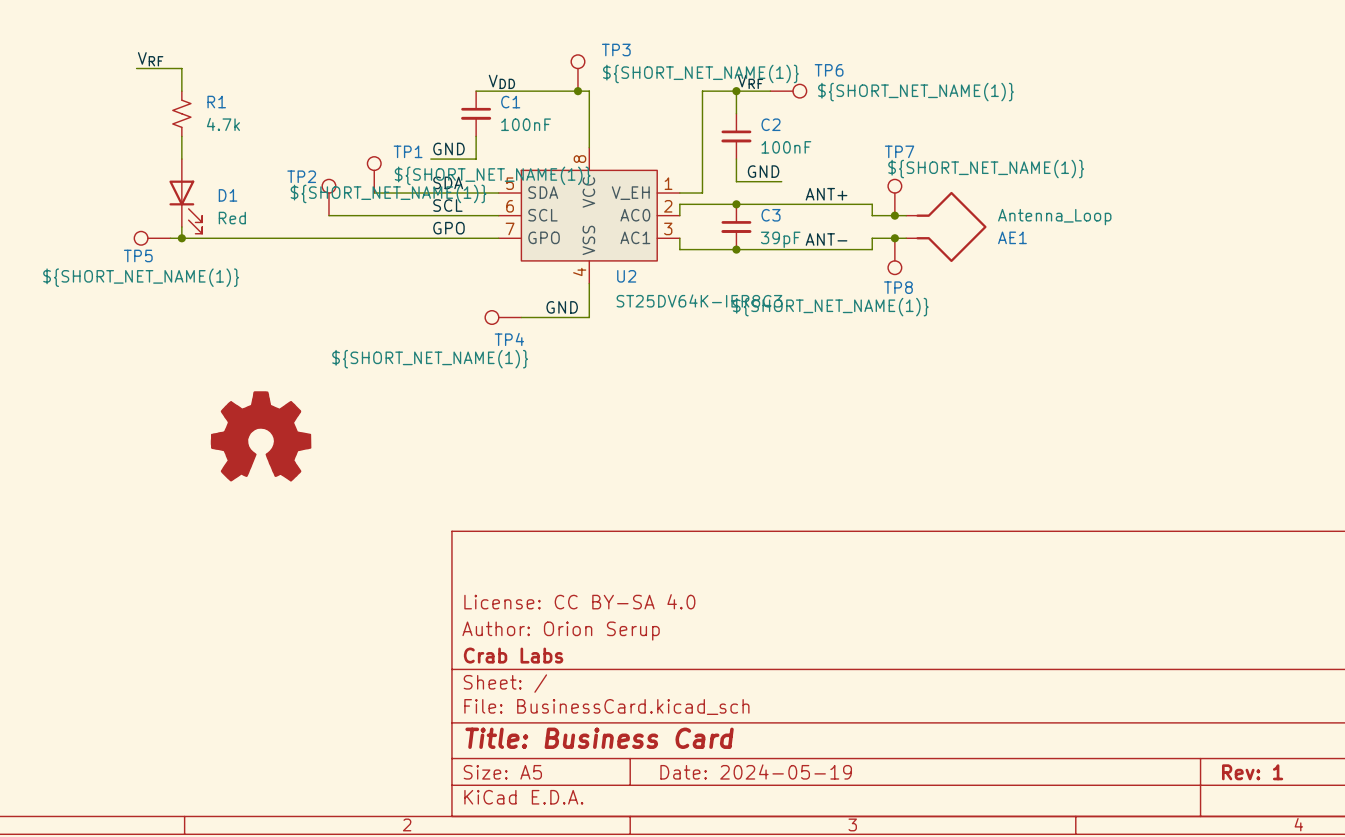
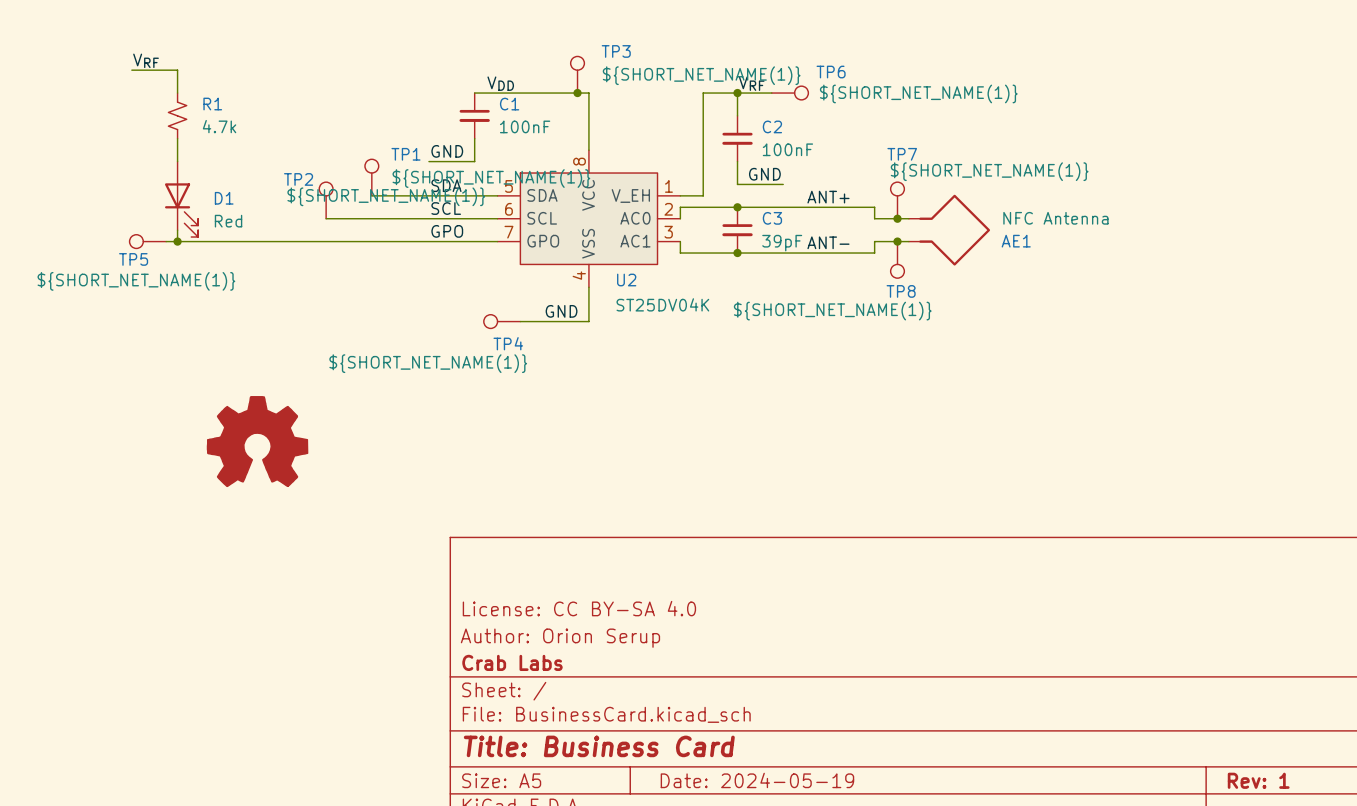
AE1 value: Antenna_Loop (1054, 217) -> NFC Antenna (1055, 218)
U2 value: ST25DV64K-IER8C3 (699, 300) -> ST25DV04K (662, 304)

